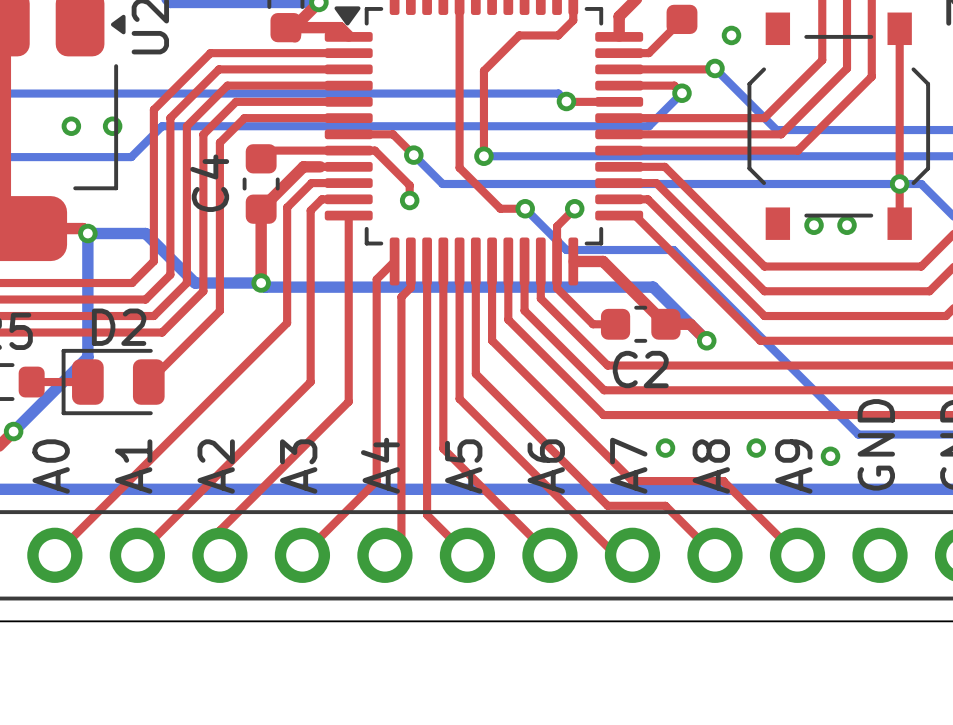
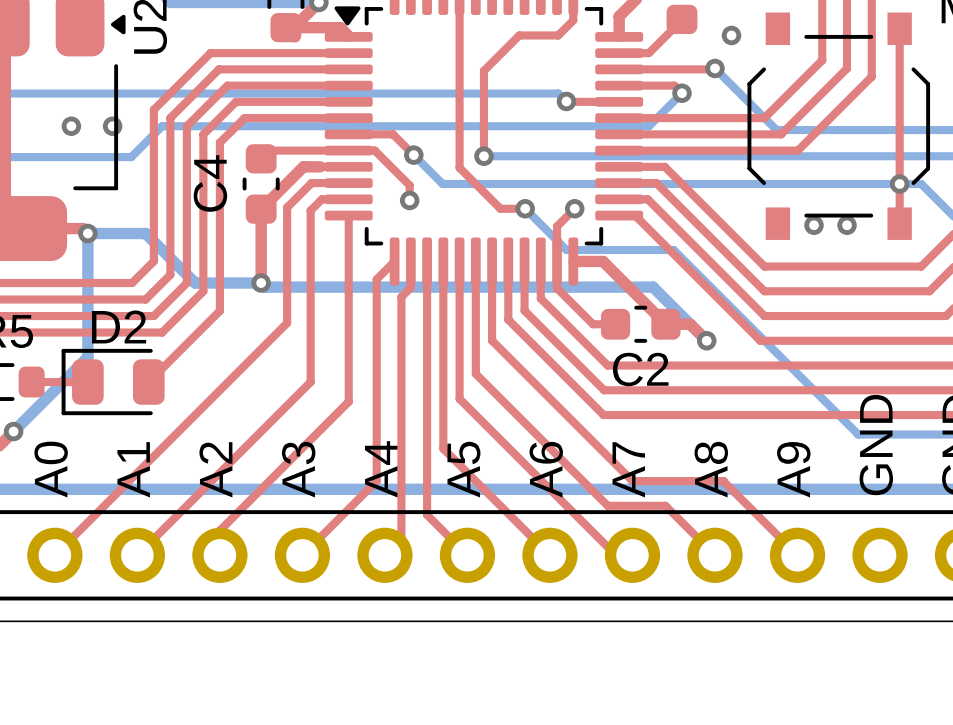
via: (665, 448) -> none
via: (756, 448) -> none
via: (830, 456) -> none

